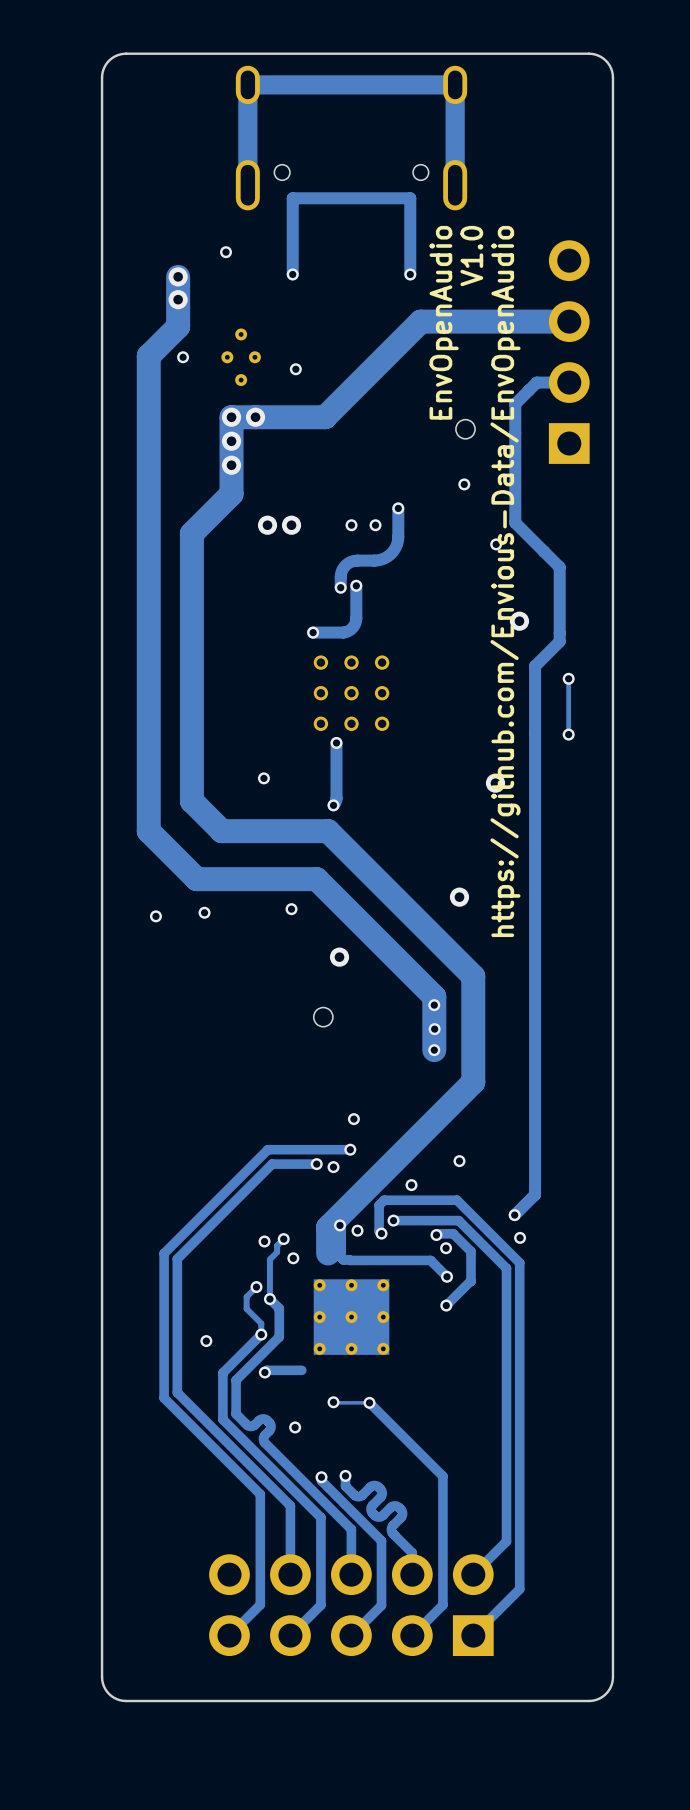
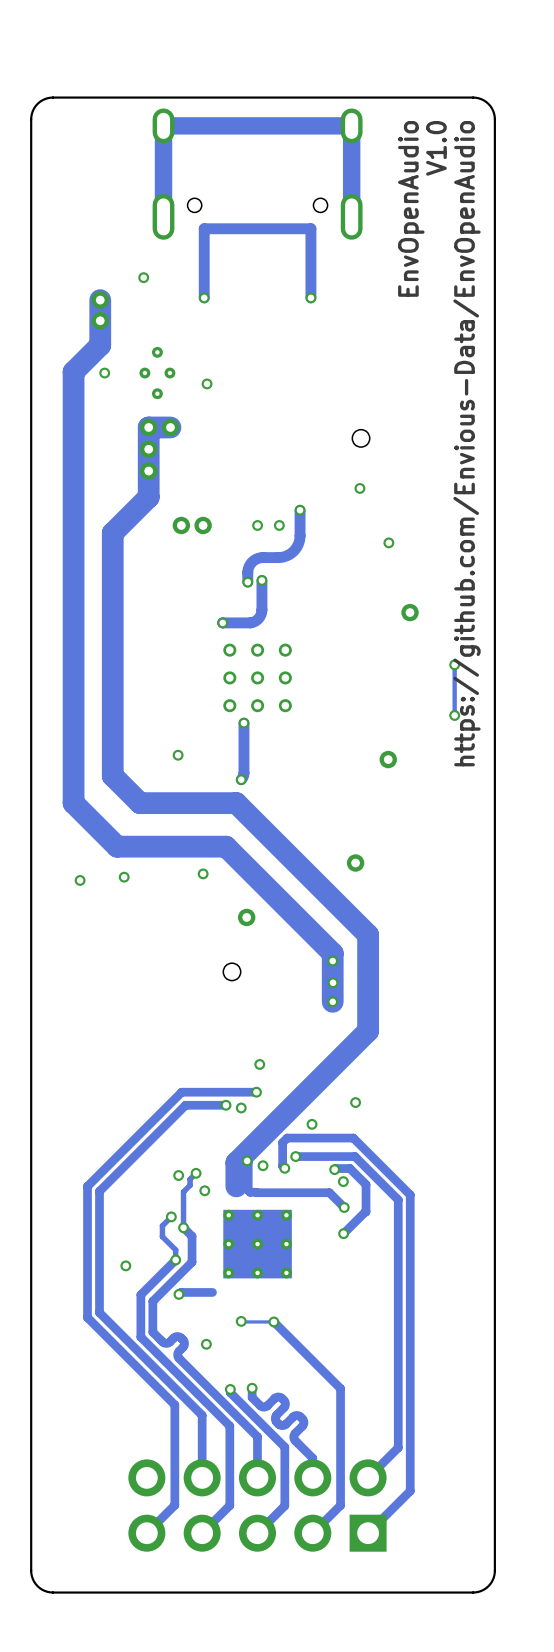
text position: V1.0 (471, 256) -> V1.0 (436, 148)
track: (569, 321) (420, 321) (325, 417) (255, 417) -> none
text position: EnvOpenAudio (444, 322) -> EnvOpenAudio (411, 208)
part: (569, 352) -> none
track: (569, 382) (536, 382) (515, 404) (515, 522) (559, 567) (559, 641) (535, 666) (535, 1194) (514, 1215) -> none
text position: https://github.com/Envious-Data/EnvOpenAudio (505, 581) -> https://github.com/Envious-Data/EnvOpenAudio (467, 443)
via: (514, 1215) -> none
via: (520, 1237) -> none

